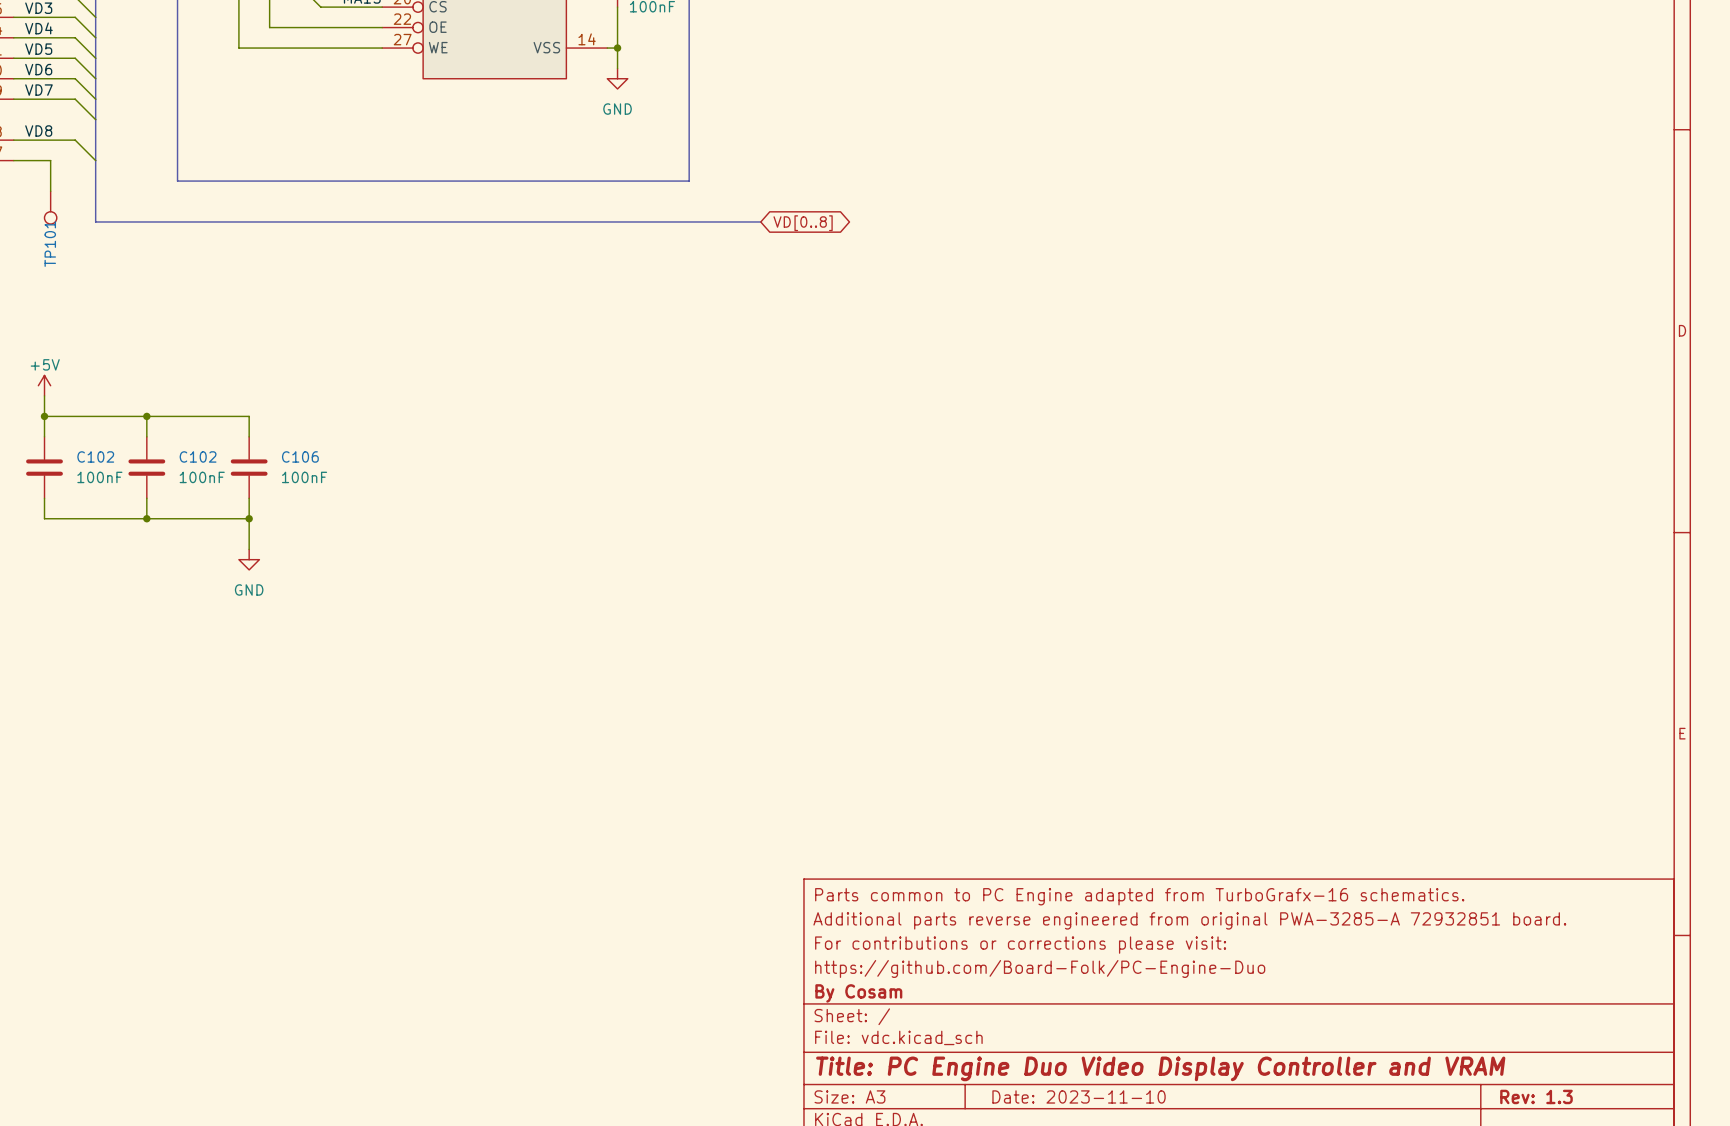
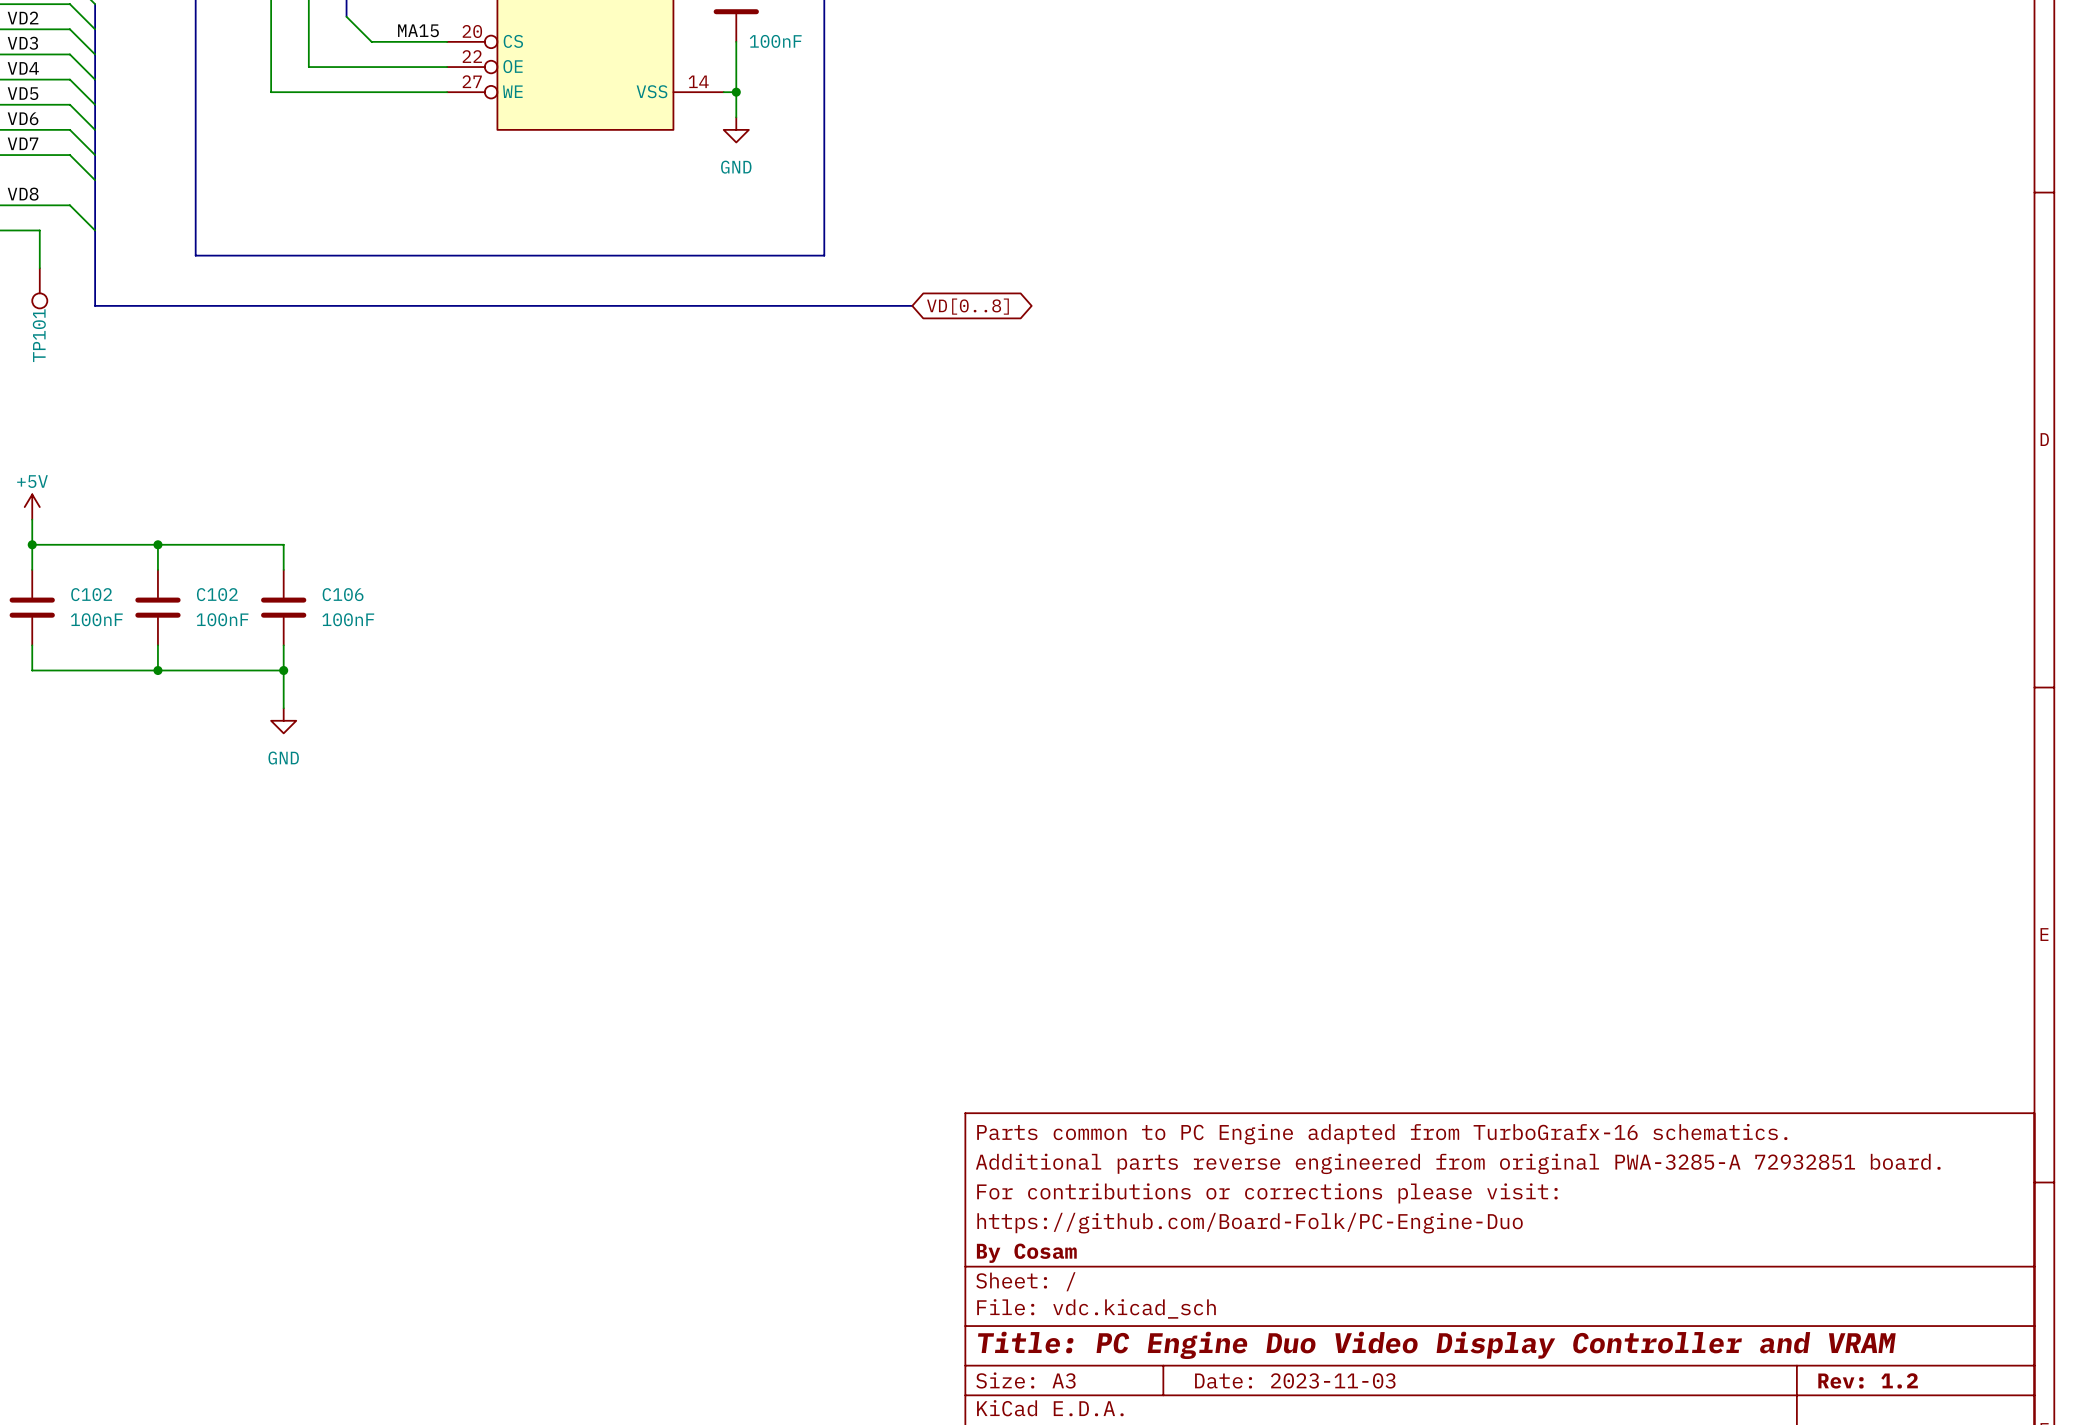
title block: Date: 2023-11-10 (1079, 1096) -> Date: 2023-11-03 (1295, 1380)
title block: Rev: 1.3 (1536, 1096) -> Rev: 1.2 (1868, 1380)

